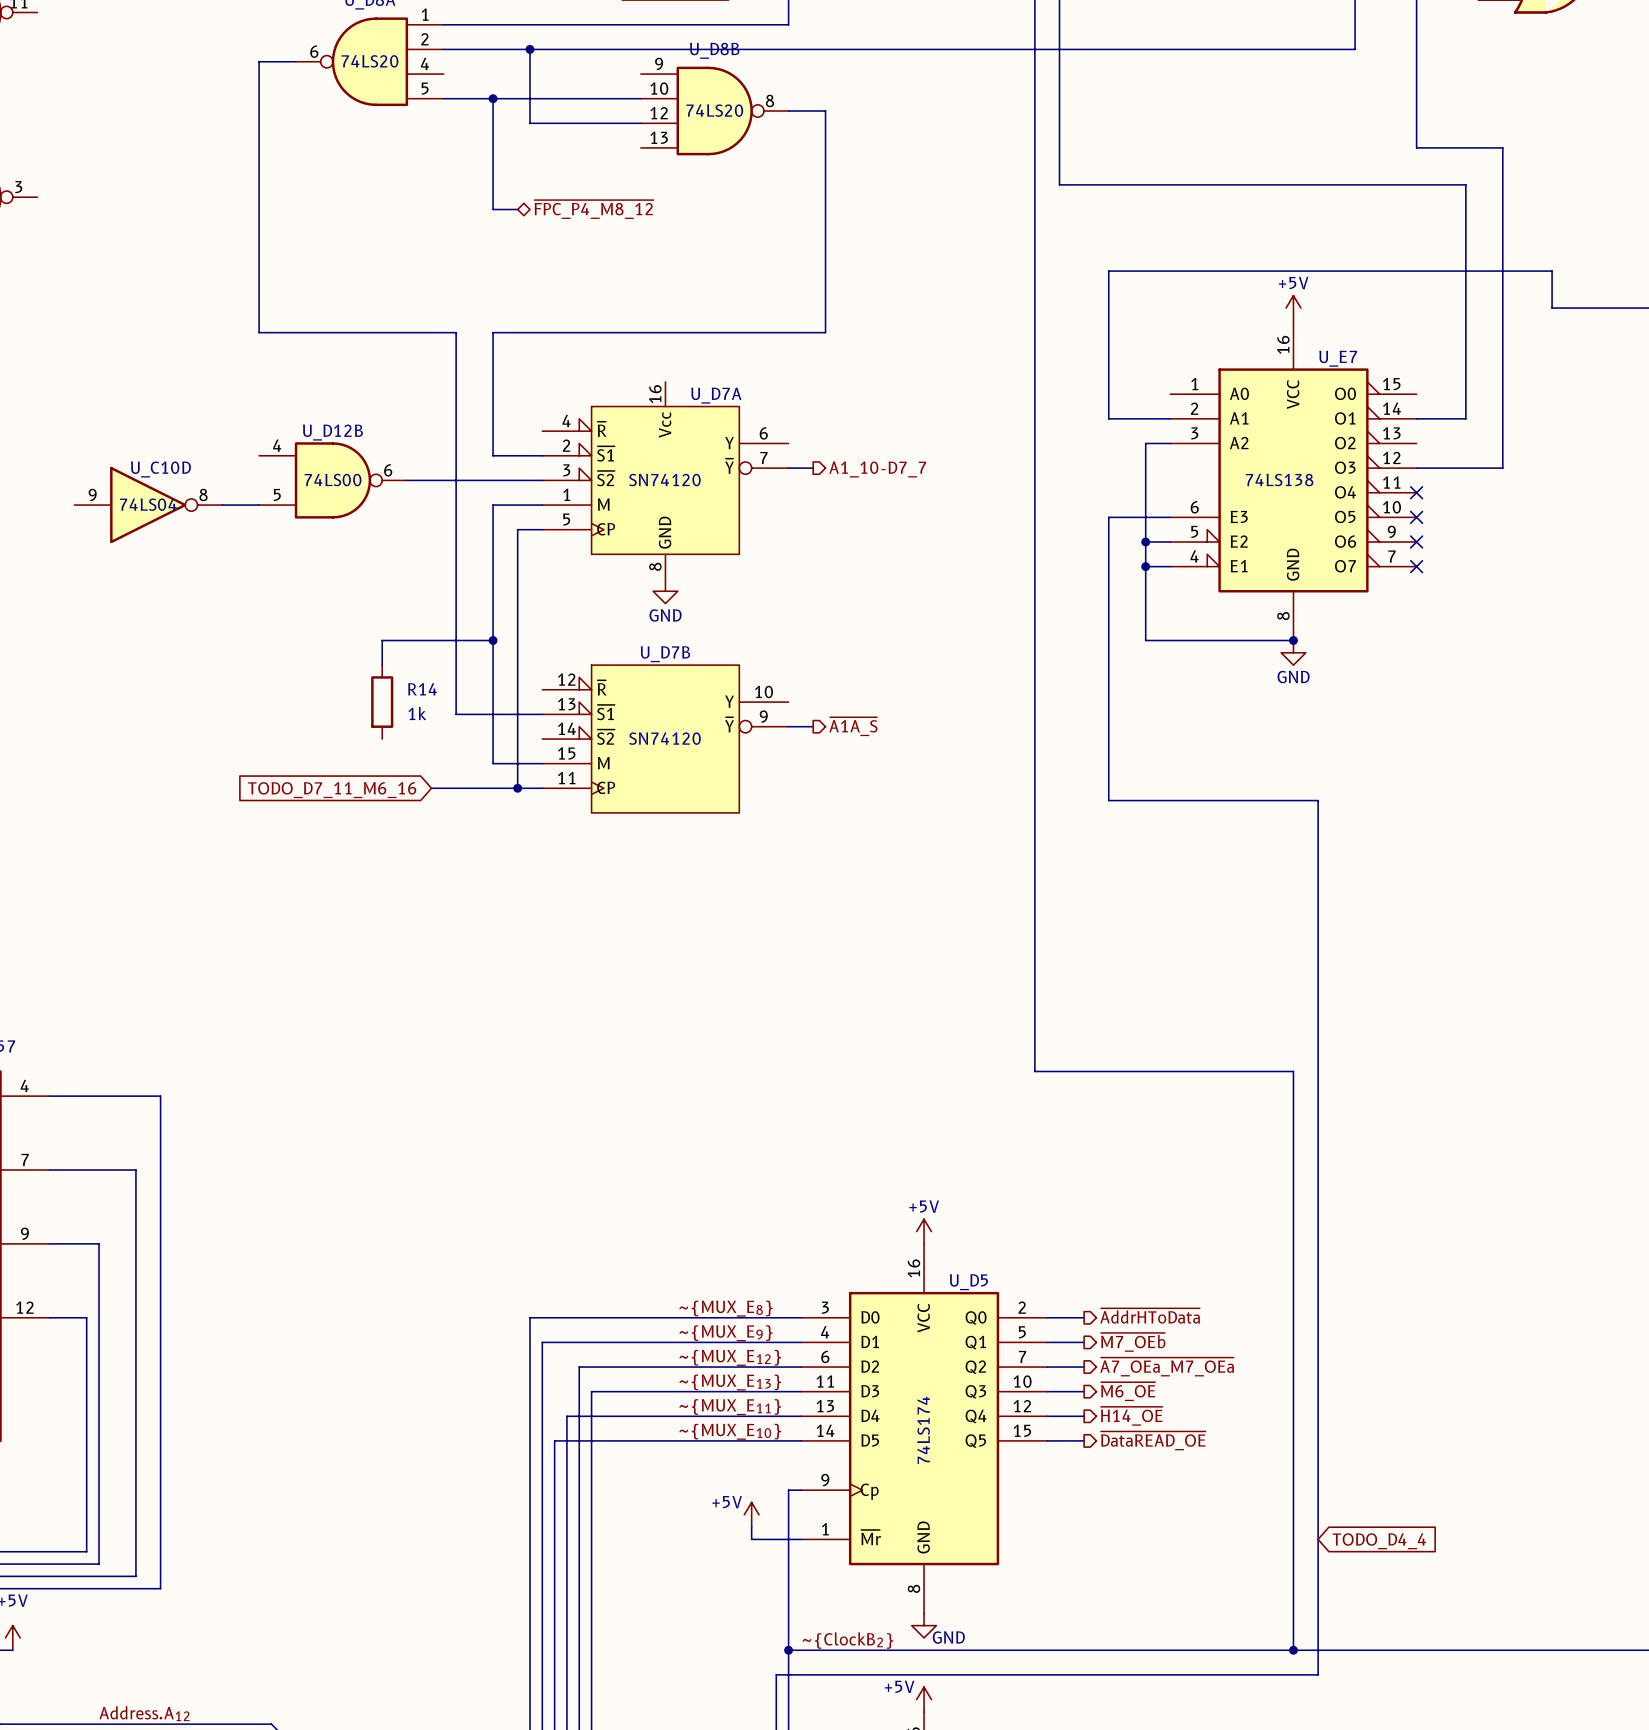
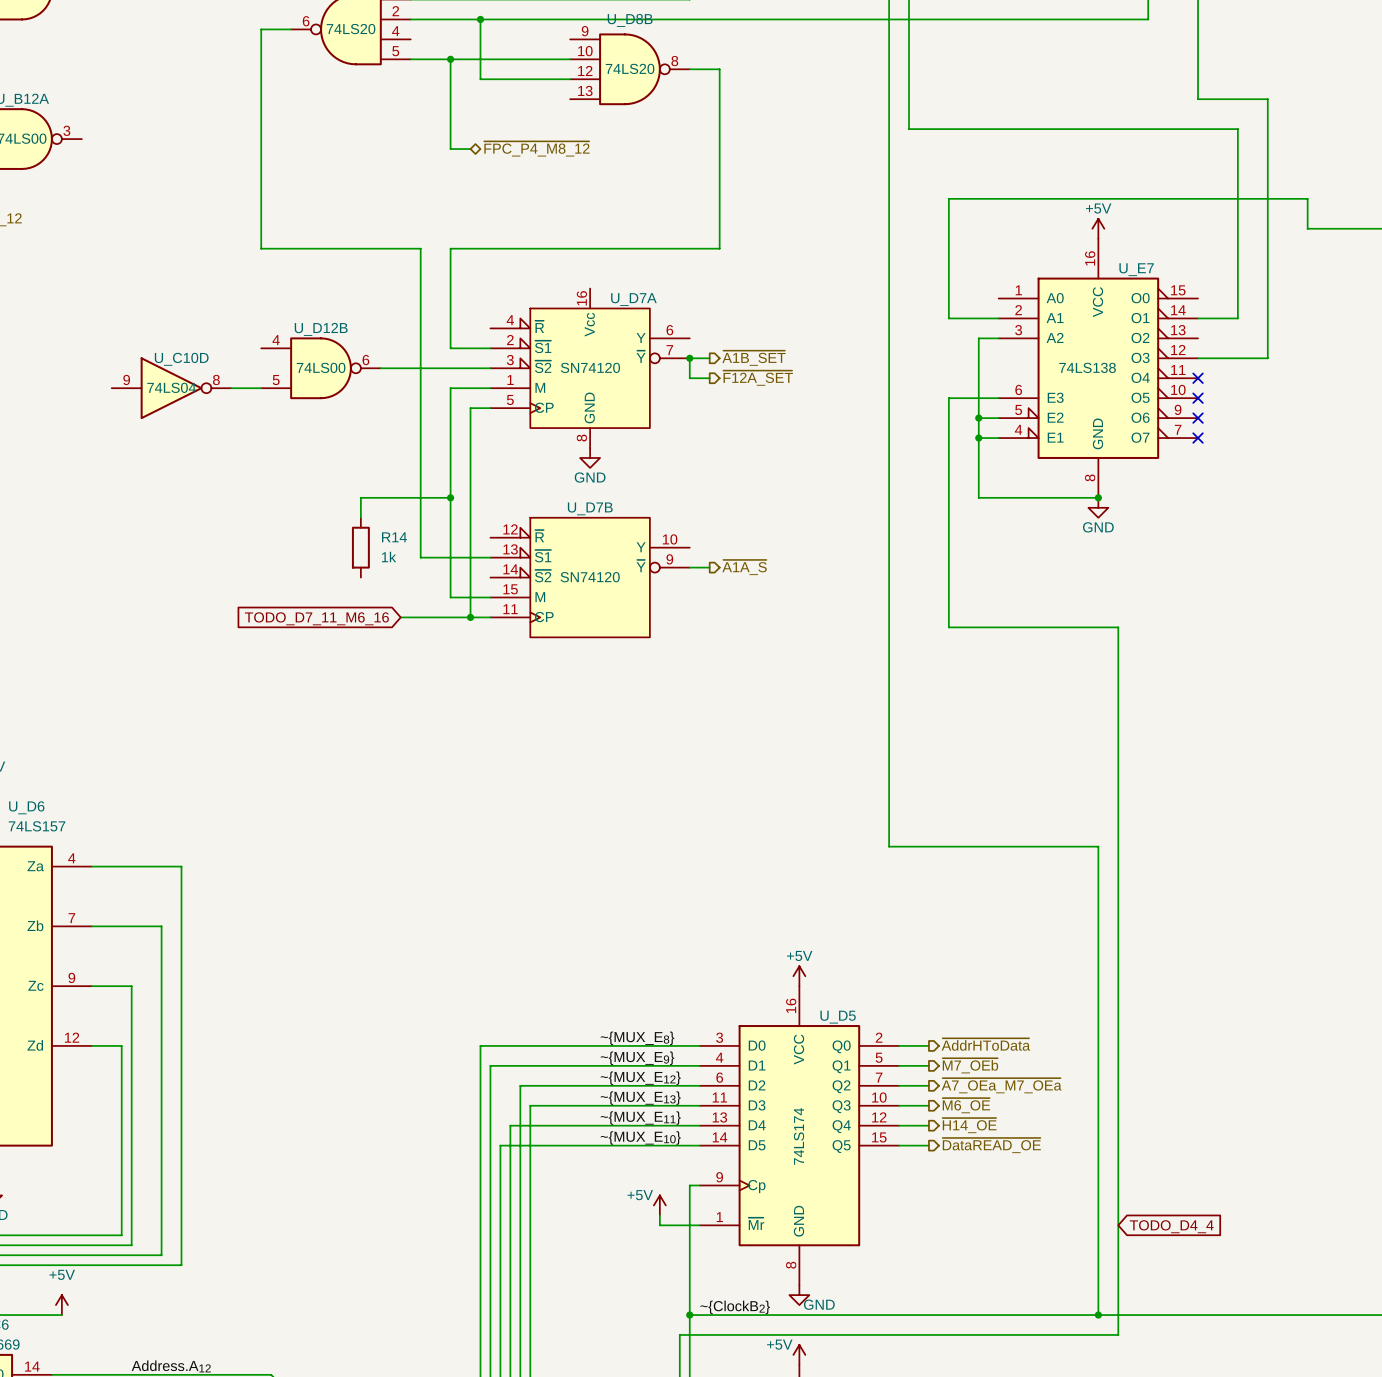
wire: none -> (689, 358) (689, 378) (709, 378)
junction: none -> (689, 358)
hierarchical label: A1_10-D7_7 (877, 469) -> ~{A1B_SET} (754, 358)
hierarchical label: none -> ~{F12A_SET} (758, 378)

